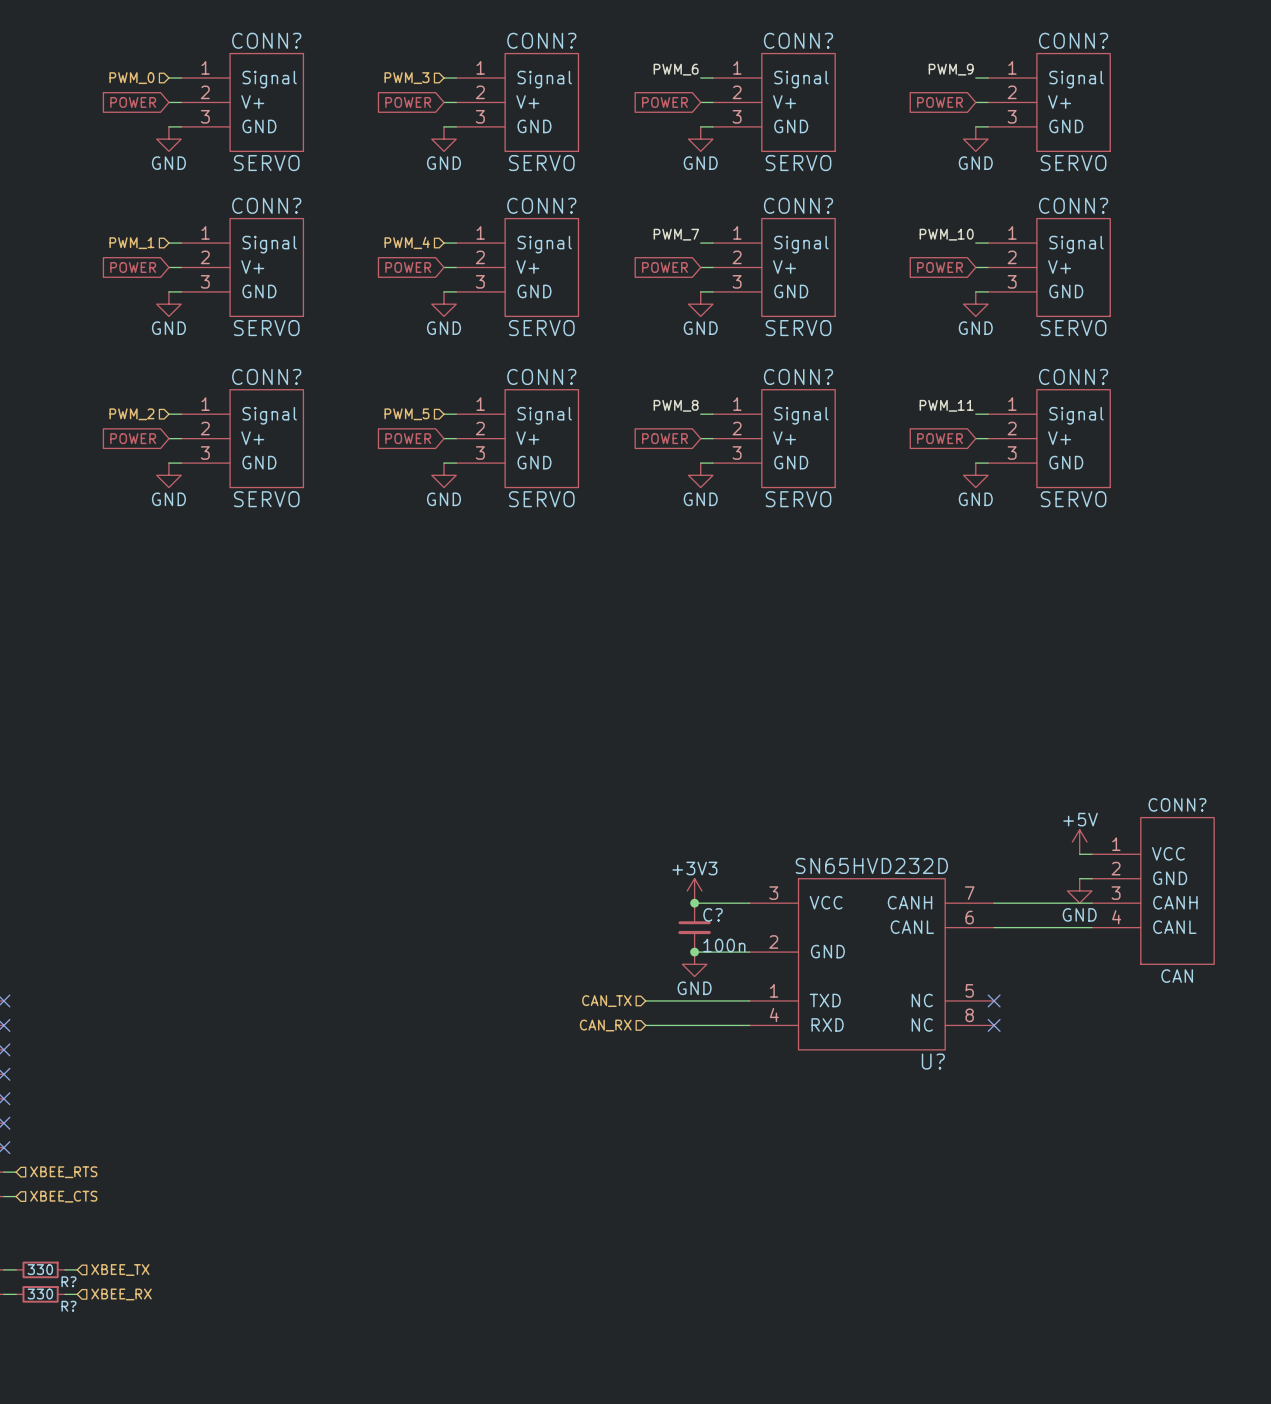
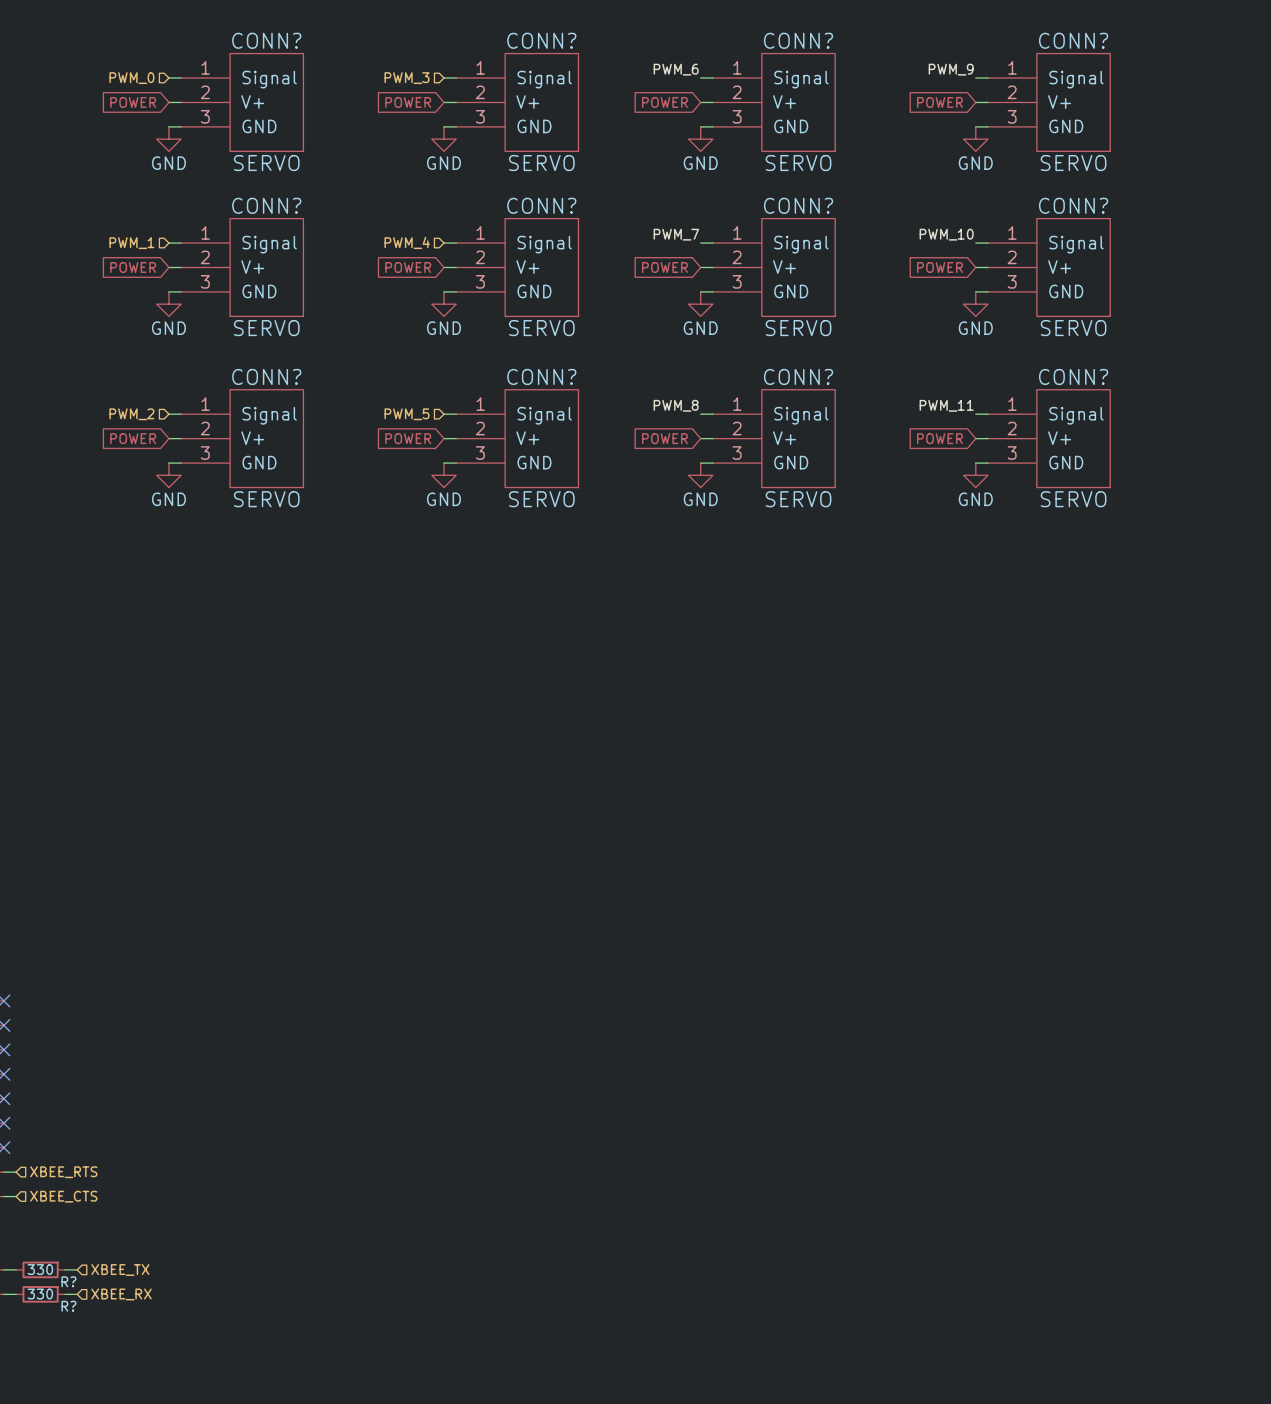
power symbol: +5V (1079, 842) -> none
wire: (1079, 854) (1091, 854) -> none
wire: (1079, 878) (1091, 878) -> none
power symbol: +3V3 (694, 890) -> none
power symbol: GND (1079, 890) -> none
CONN?: CAN (1153, 890) -> none
wire: (694, 903) (749, 903) -> none
junction: (694, 903) -> none
wire: (994, 903) (1091, 903) -> none
C?: 100n (694, 927) -> none
wire: (994, 927) (1091, 927) -> none
wire: (694, 952) (749, 952) -> none
junction: (694, 952) -> none
power symbol: GND (694, 964) -> none
U?: SN65HVD232D (871, 964) -> none
wire: (645, 1000) (749, 1000) -> none
no-connect mark: (994, 1000) -> none
hierarchical label: CAN_TX (606, 1001) -> none
hierarchical label: CAN_RX (605, 1025) -> none
wire: (645, 1025) (749, 1025) -> none
no-connect mark: (994, 1025) -> none

